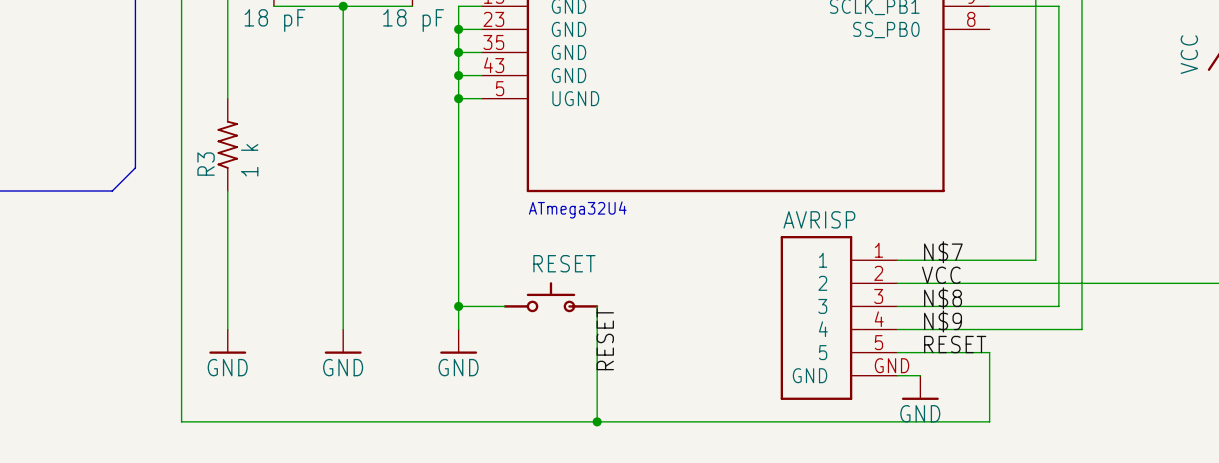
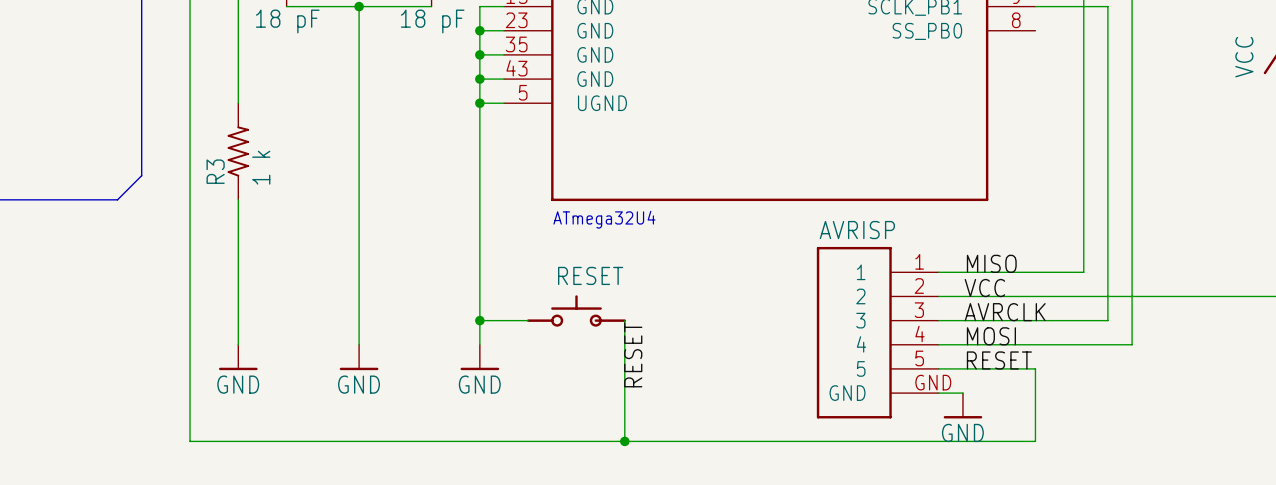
label: N$7 (943, 252) -> MISO (991, 263)
label: N$8 (943, 298) -> AVRCLK (1005, 312)
label: N$9 (943, 321) -> MOSI (991, 336)

